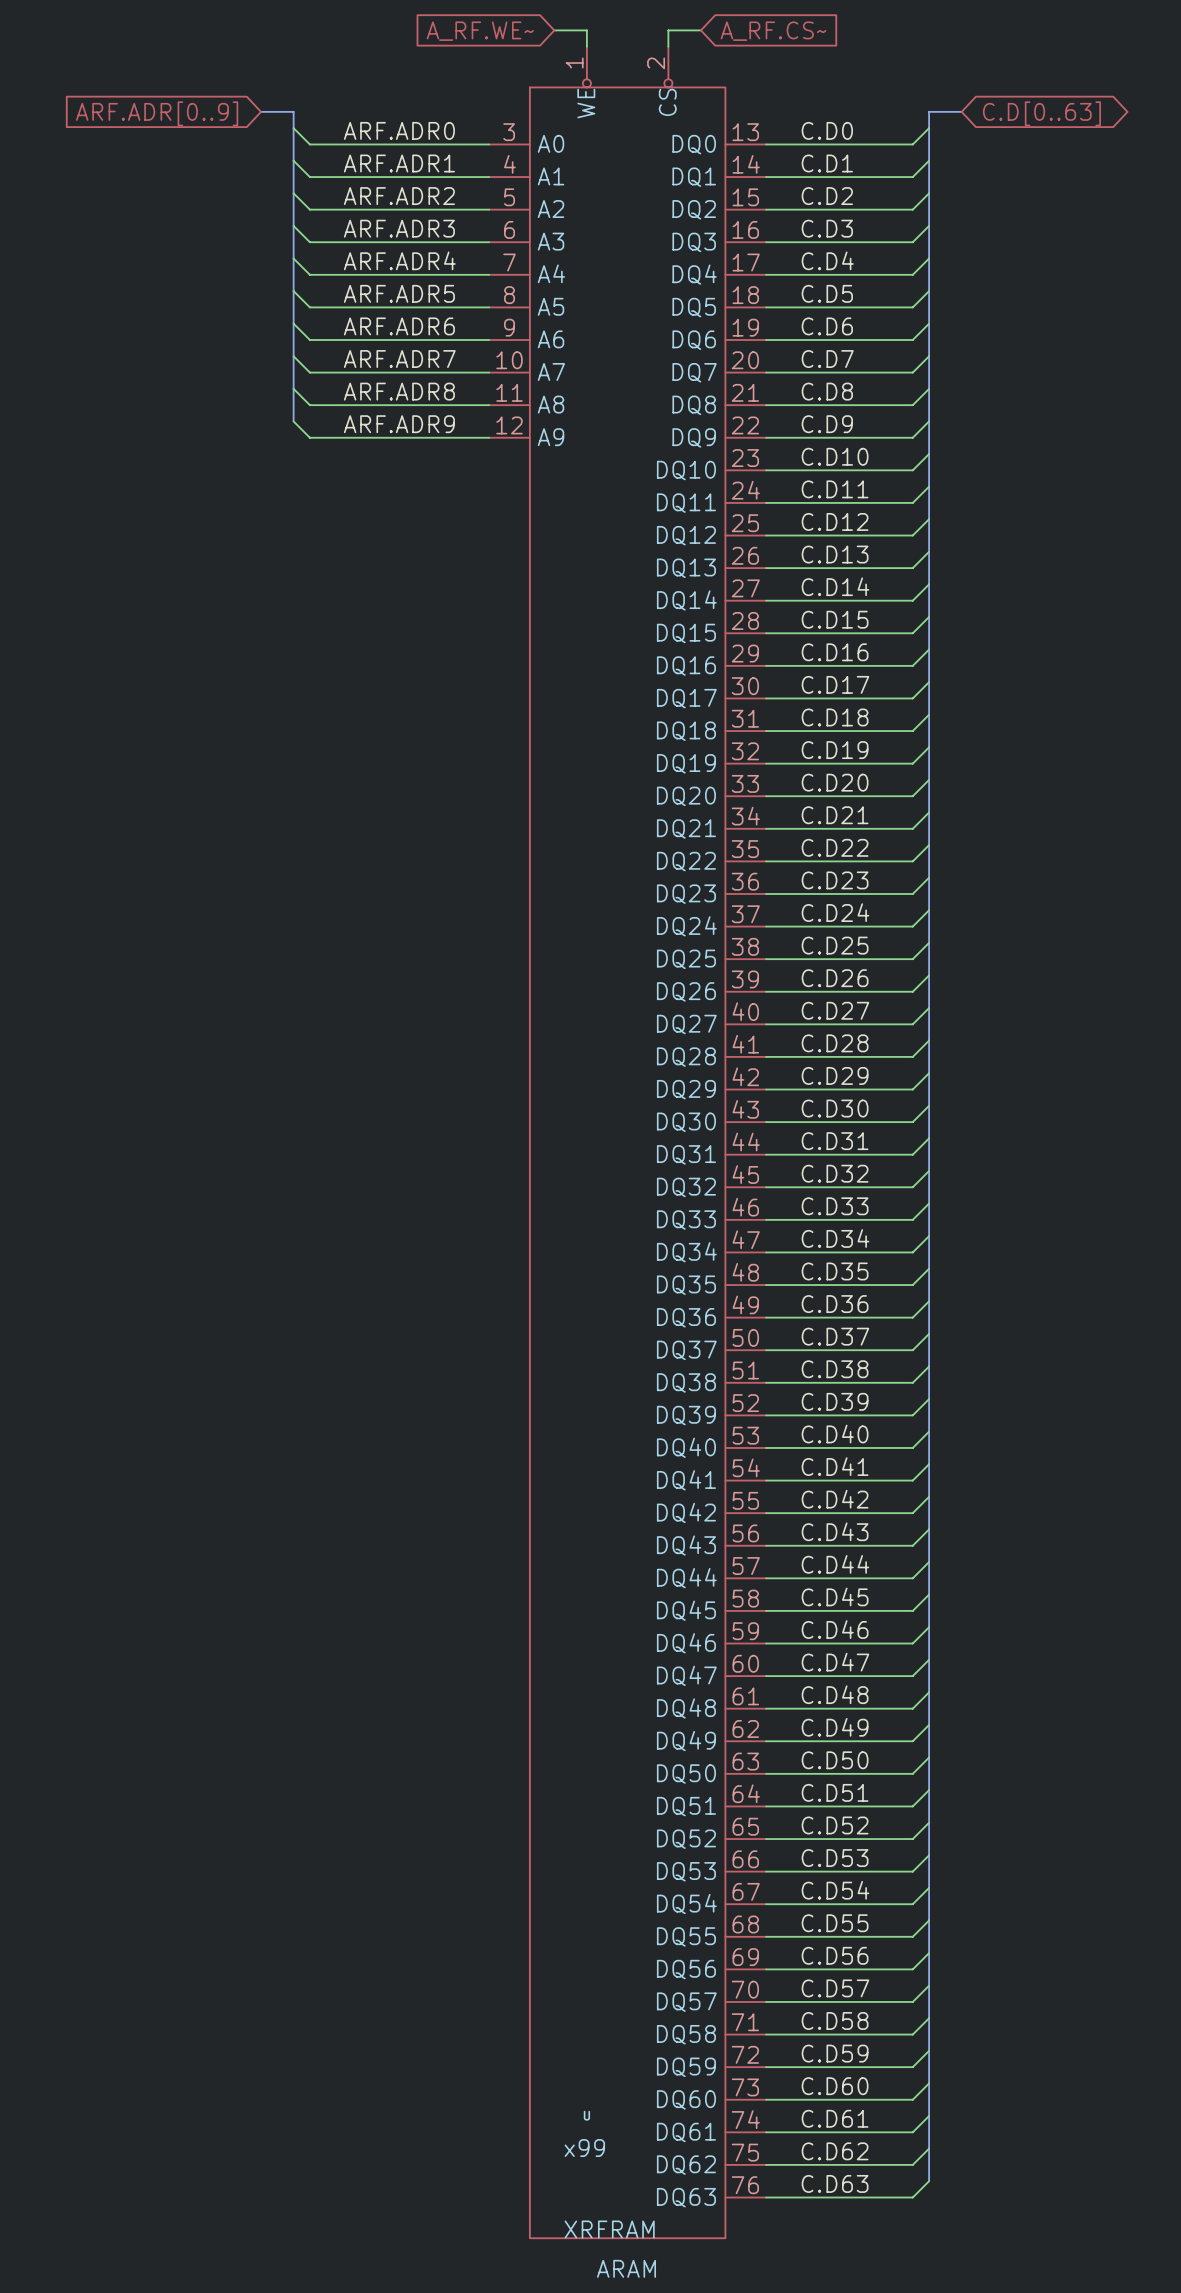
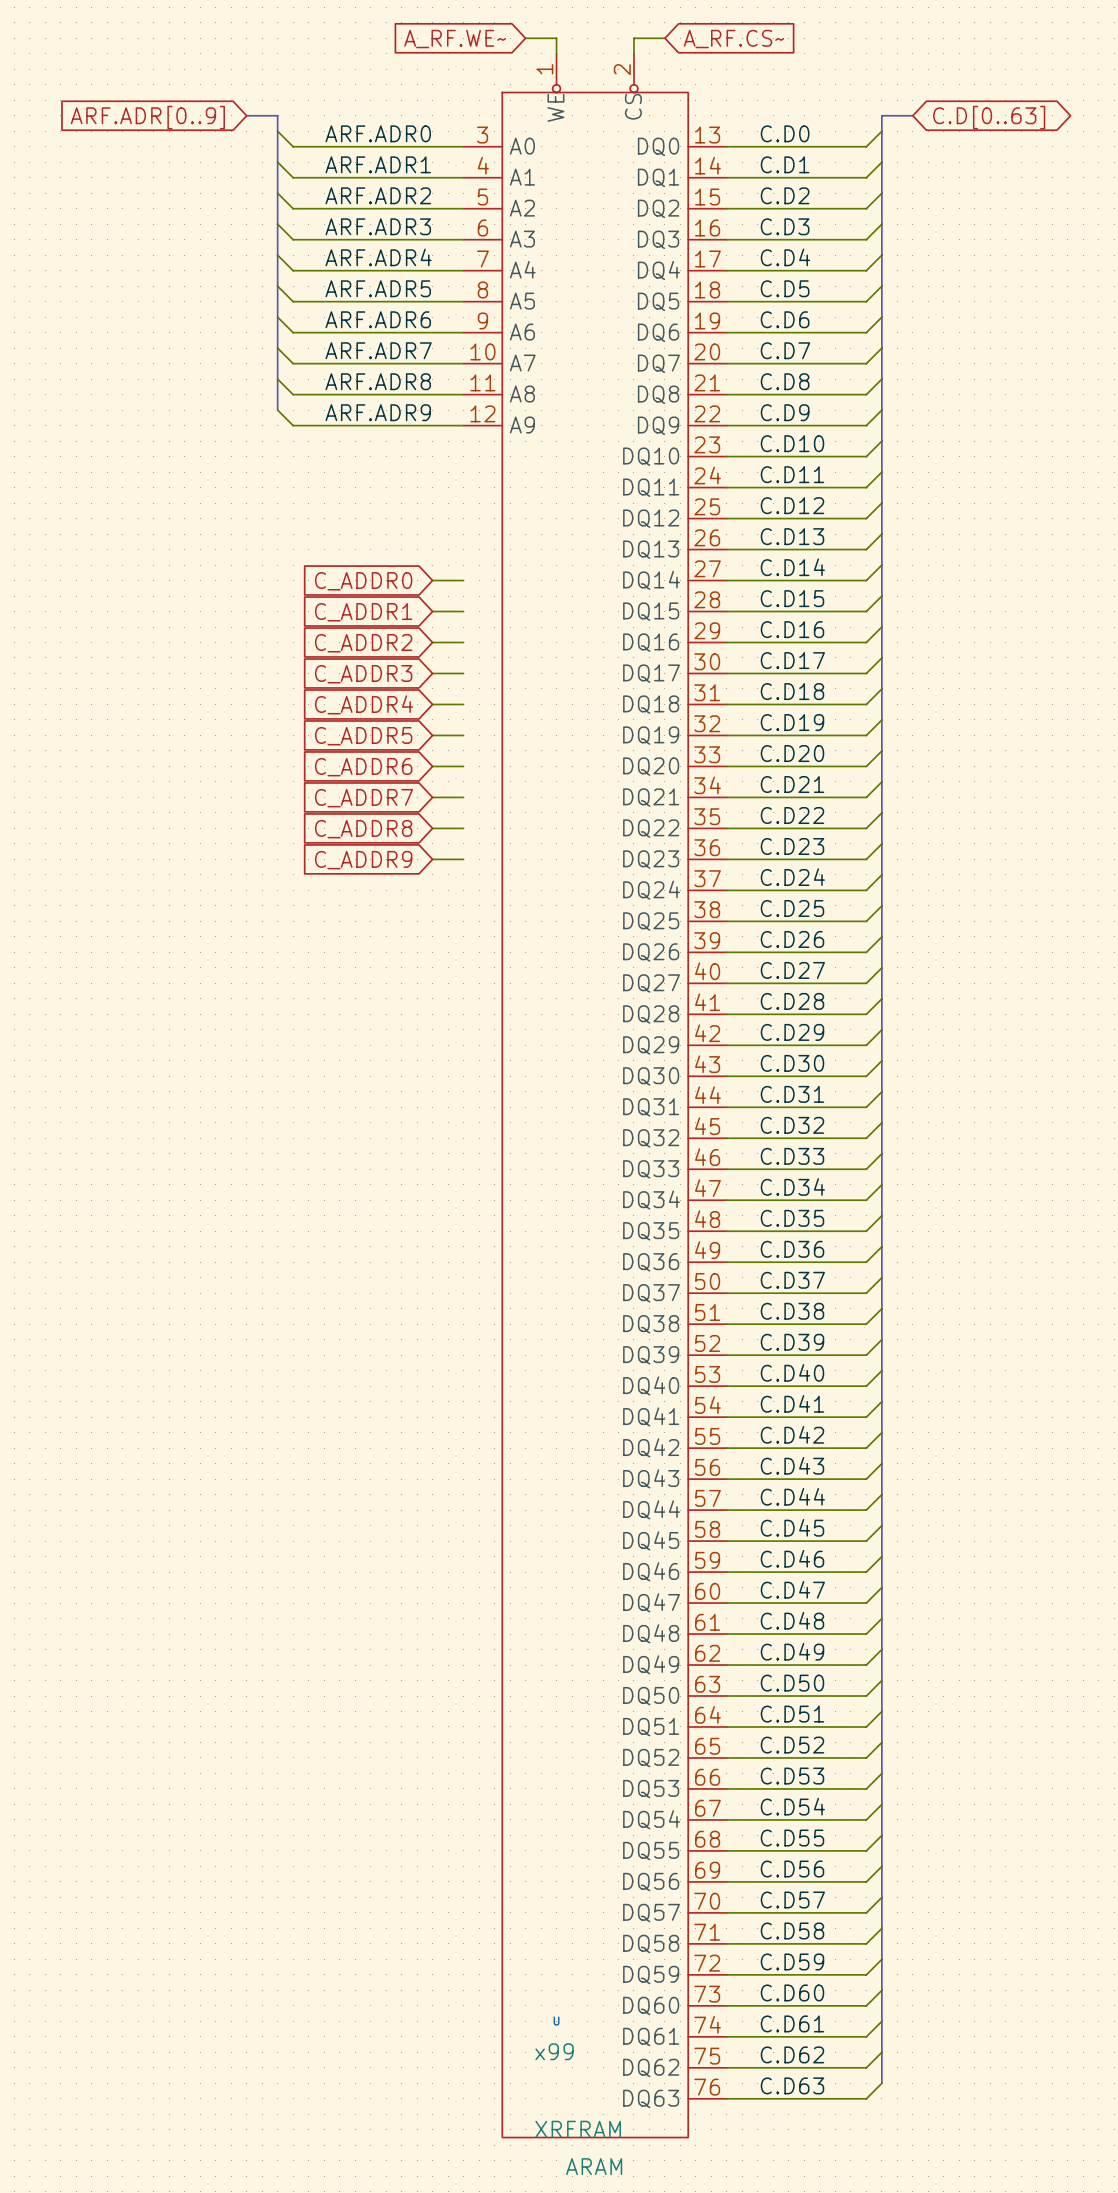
wire: none -> (432, 580) (463, 580)
global label: none -> C_ADDR0 (363, 581)
wire: none -> (432, 611) (463, 611)
global label: none -> C_ADDR1 (363, 612)
wire: none -> (432, 642) (463, 642)
global label: none -> C_ADDR2 (363, 643)
wire: none -> (432, 673) (463, 673)
global label: none -> C_ADDR3 (363, 674)
global label: none -> C_ADDR4 (364, 704)
wire: none -> (432, 704) (463, 704)
wire: none -> (432, 735) (463, 735)
global label: none -> C_ADDR5 (363, 736)
wire: none -> (432, 766) (463, 766)
global label: none -> C_ADDR6 (363, 767)
wire: none -> (432, 797) (463, 797)
global label: none -> C_ADDR7 (364, 798)
wire: none -> (432, 828) (463, 828)
global label: none -> C_ADDR8 (363, 829)
wire: none -> (432, 859) (463, 859)
global label: none -> C_ADDR9 (363, 860)

